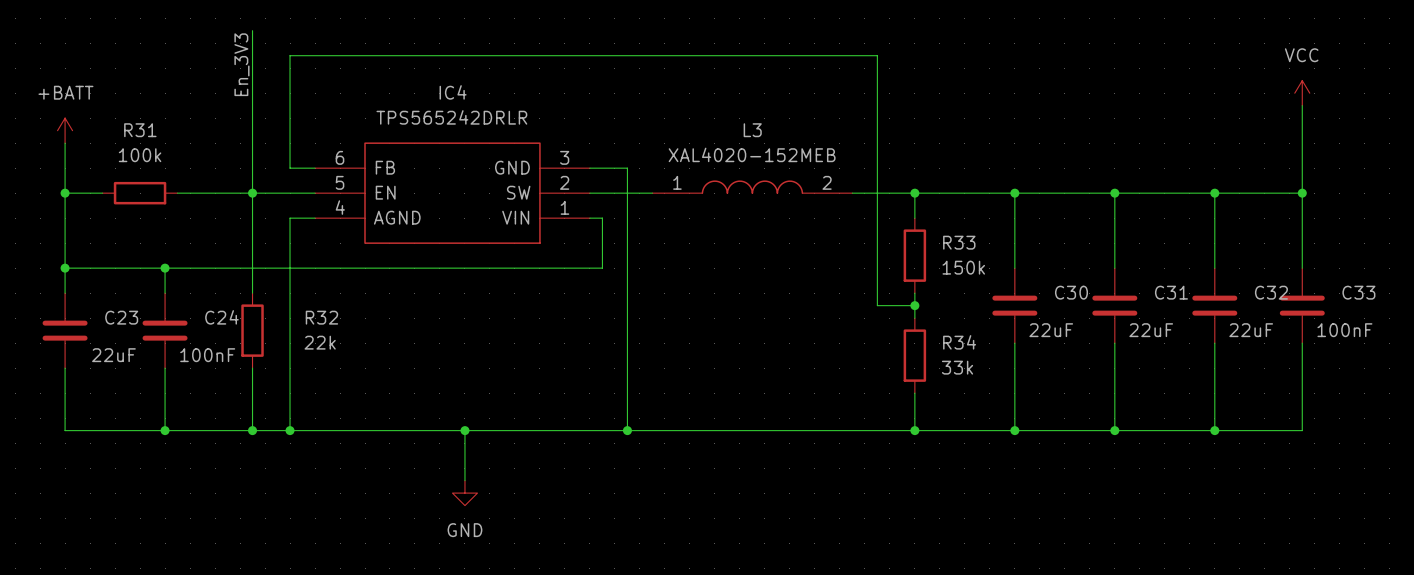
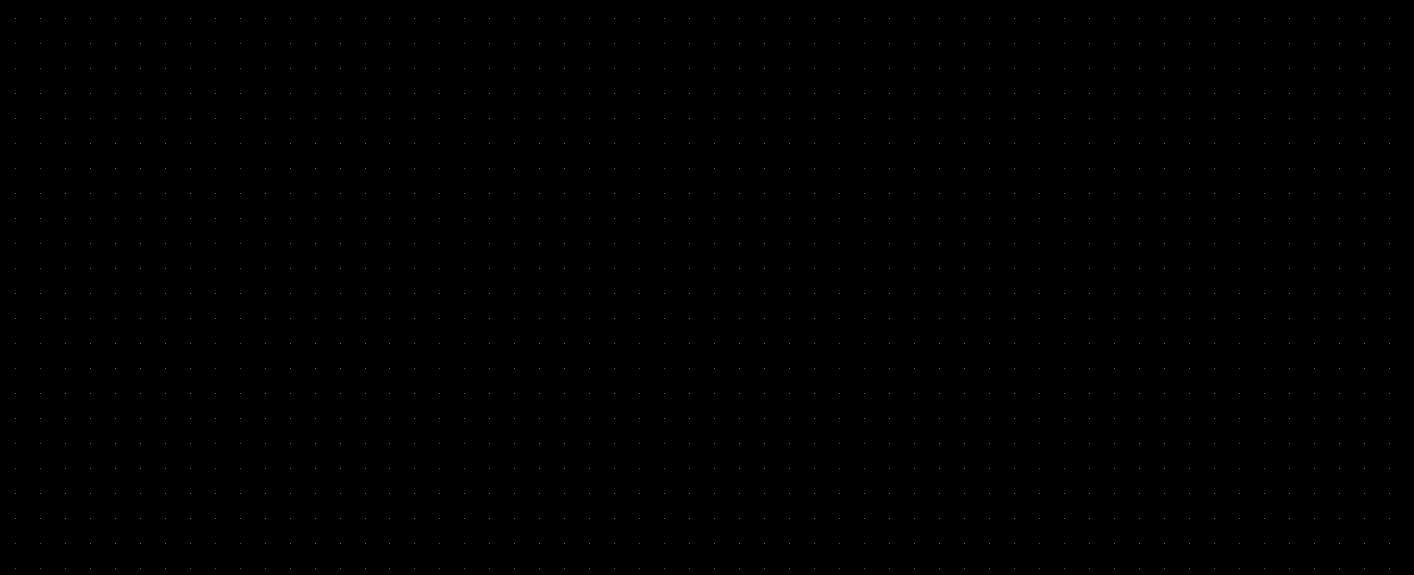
wire: (252, 30) (252, 293) -> none
label: En_3V3 (241, 64) -> none
power symbol: VCC (1302, 93) -> none
wire: (1302, 105) (1302, 268) -> none
power symbol: +BATT (65, 130) -> none
wire: (65, 143) (65, 293) -> none
wire: (315, 168) (290, 168) (290, 55) (877, 55) (877, 305) (914, 305) -> none
wire: (589, 168) (627, 168) (627, 430) -> none
L3: XAL4020-152MEB (752, 187) -> none
wire: (65, 193) (102, 193) -> none
junction: (65, 193) -> none
R31: 100k (140, 193) -> none
wire: (177, 193) (315, 193) -> none
junction: (252, 193) -> none
IC4: TPS565242DRLR (452, 193) -> none
wire: (589, 193) (652, 193) -> none
wire: (852, 193) (1302, 193) -> none
wire: (914, 193) (914, 218) -> none
junction: (914, 193) -> none
wire: (1014, 193) (1014, 268) -> none
junction: (1014, 193) -> none
wire: (1114, 193) (1114, 268) -> none
junction: (1114, 193) -> none
wire: (1214, 193) (1214, 268) -> none
junction: (1214, 193) -> none
junction: (1302, 193) -> none
wire: (315, 218) (290, 218) (290, 430) -> none
wire: (589, 218) (602, 218) (602, 268) (65, 268) -> none
R33: 150k (914, 255) -> none
junction: (65, 268) -> none
wire: (165, 268) (165, 293) -> none
junction: (165, 268) -> none
wire: (914, 293) (914, 318) -> none
junction: (914, 305) -> none
C30: 22uF (1014, 305) -> none
C31: 22uF (1114, 305) -> none
C32: 22uF (1214, 305) -> none
C33: 100nF (1302, 305) -> none
C23: 22uF (65, 330) -> none
C24: 100nF (165, 330) -> none
R32: 22k (252, 330) -> none
wire: (1014, 343) (1014, 430) -> none
wire: (1114, 343) (1114, 430) -> none
wire: (1214, 343) (1214, 430) -> none
wire: (1302, 343) (1302, 430) (65, 430) (65, 368) -> none
R34: 33k (914, 355) -> none
wire: (165, 368) (165, 430) -> none
wire: (252, 368) (252, 430) -> none
wire: (914, 393) (914, 430) -> none
junction: (165, 430) -> none
junction: (252, 430) -> none
junction: (290, 430) -> none
wire: (464, 430) (464, 480) -> none
junction: (464, 430) -> none
junction: (627, 430) -> none
junction: (914, 430) -> none
junction: (1014, 430) -> none
junction: (1114, 430) -> none
junction: (1214, 430) -> none
power symbol: GND (464, 493) -> none

